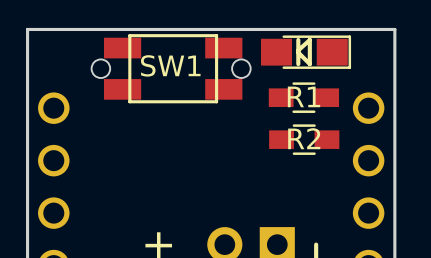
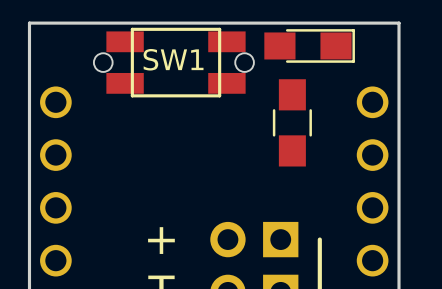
line: (298, 39) (298, 64) -> none
line: (298, 50) (309, 39) (309, 64) (298, 52) -> none
R1: (303, 97) -> none
part: none -> (292, 122)
R2: (304, 139) -> none

